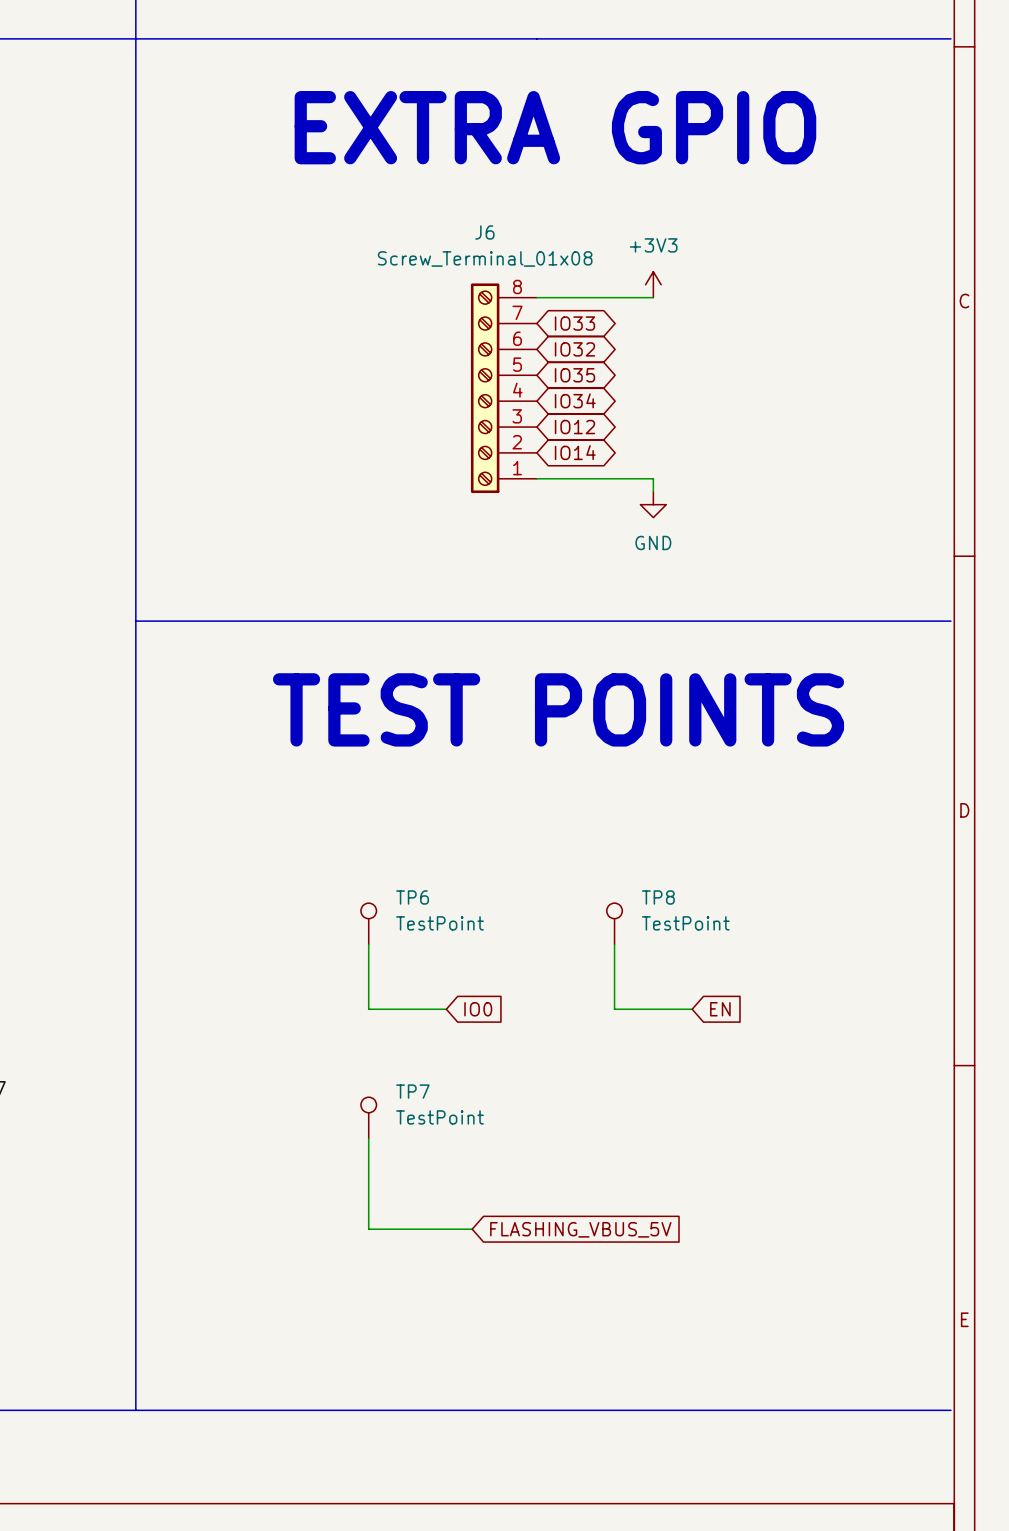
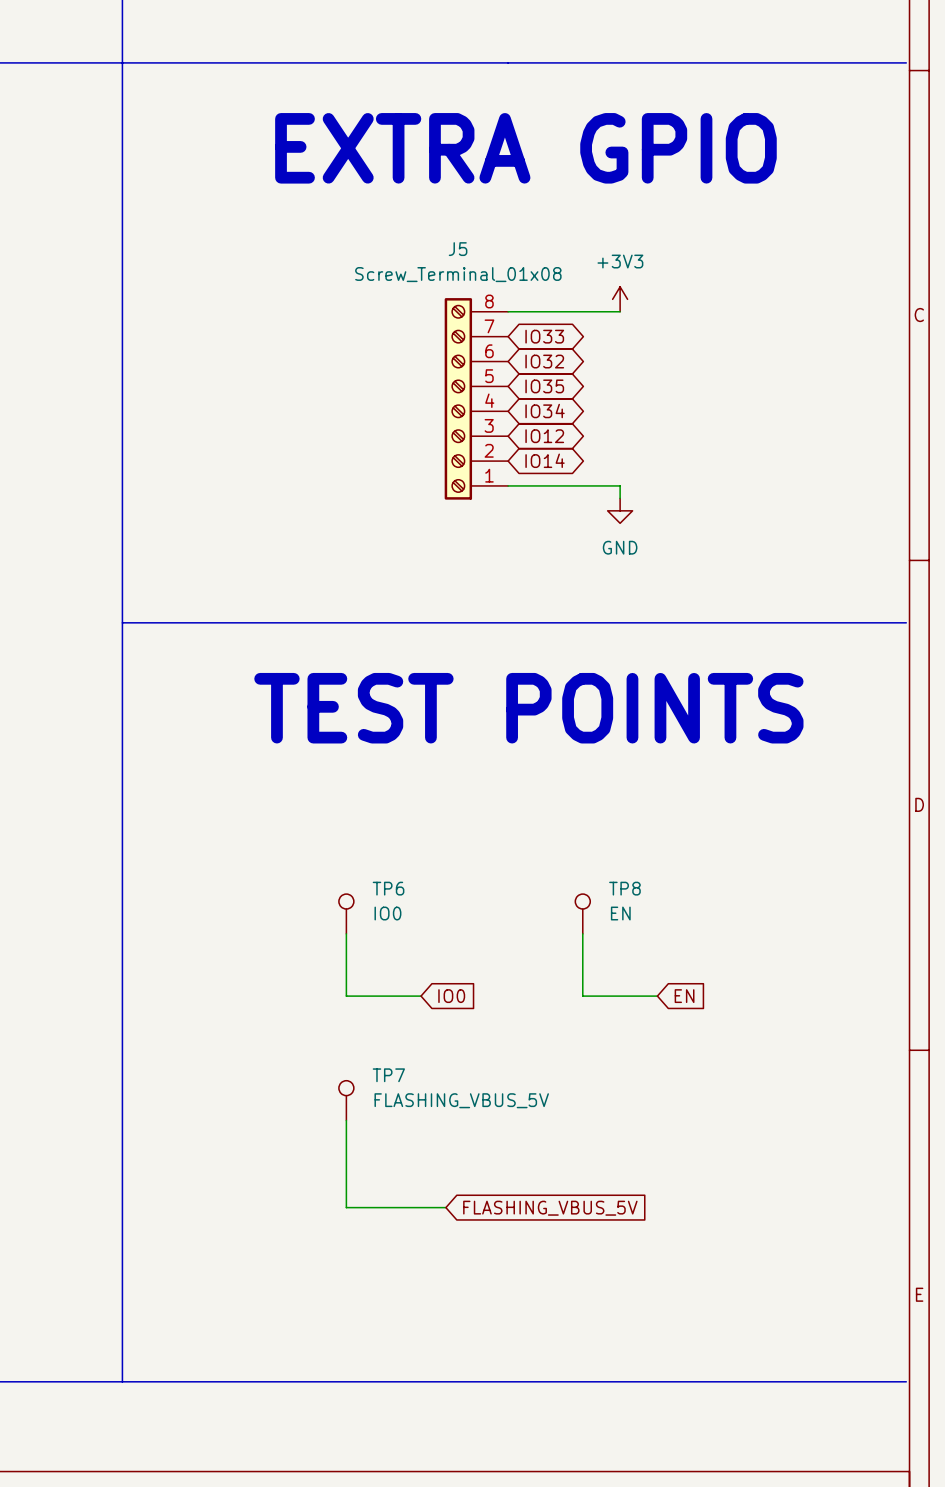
J6 name: J6 (484, 232) -> J5 (458, 249)
TP6 value: TestPoint (439, 923) -> IO0 (387, 913)
TP8 value: TestPoint (685, 923) -> EN (620, 913)
TP7 value: TestPoint (439, 1117) -> FLASHING_VBUS_5V (461, 1100)

